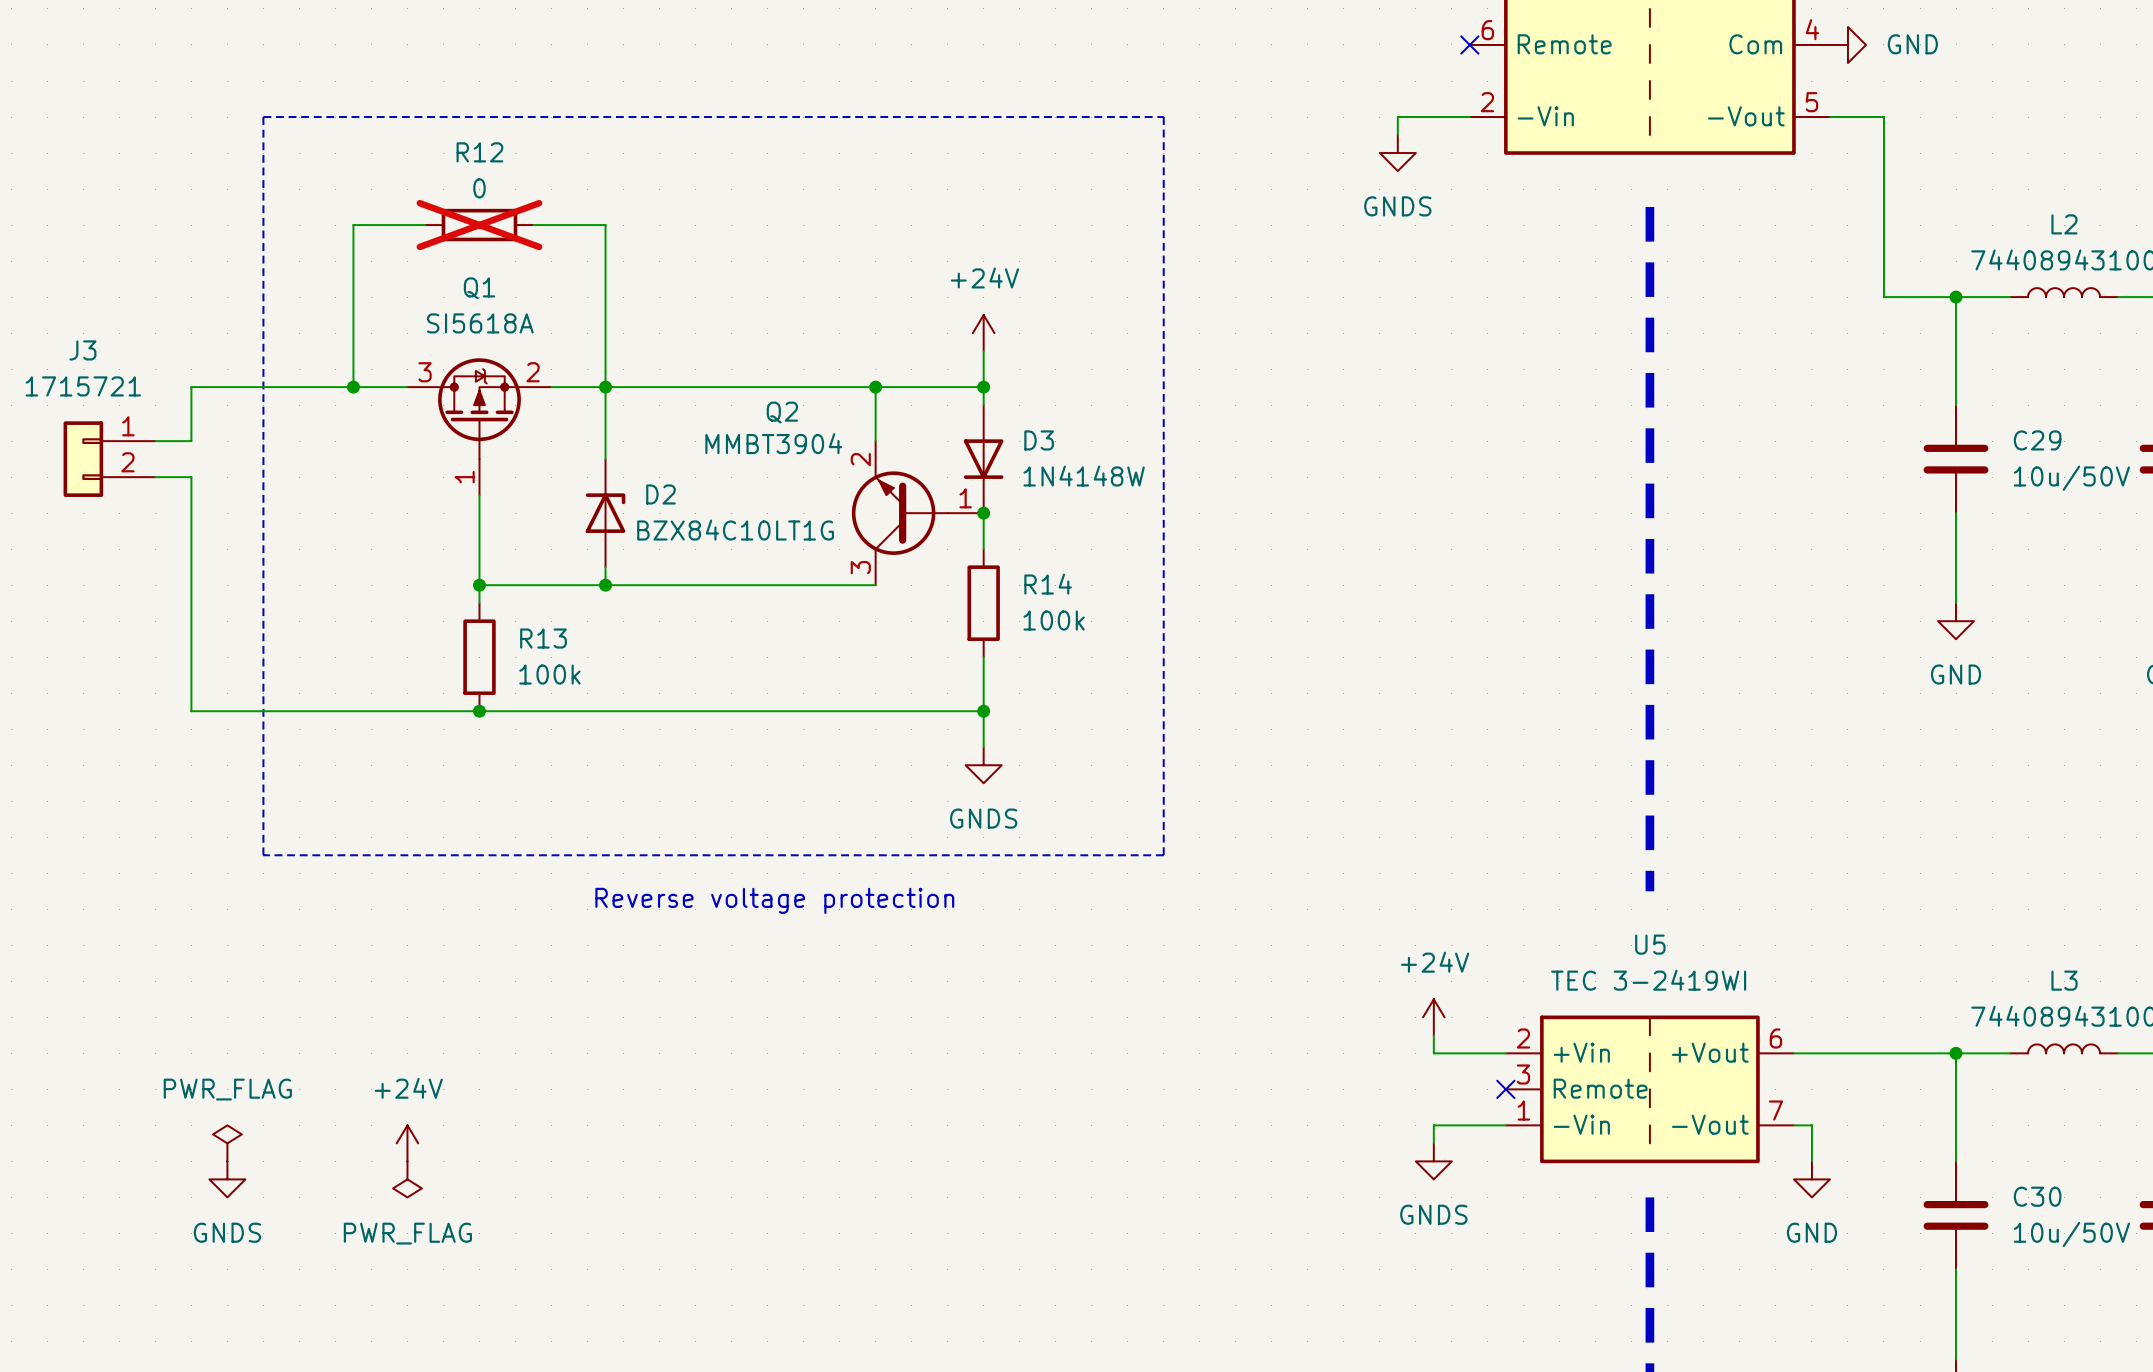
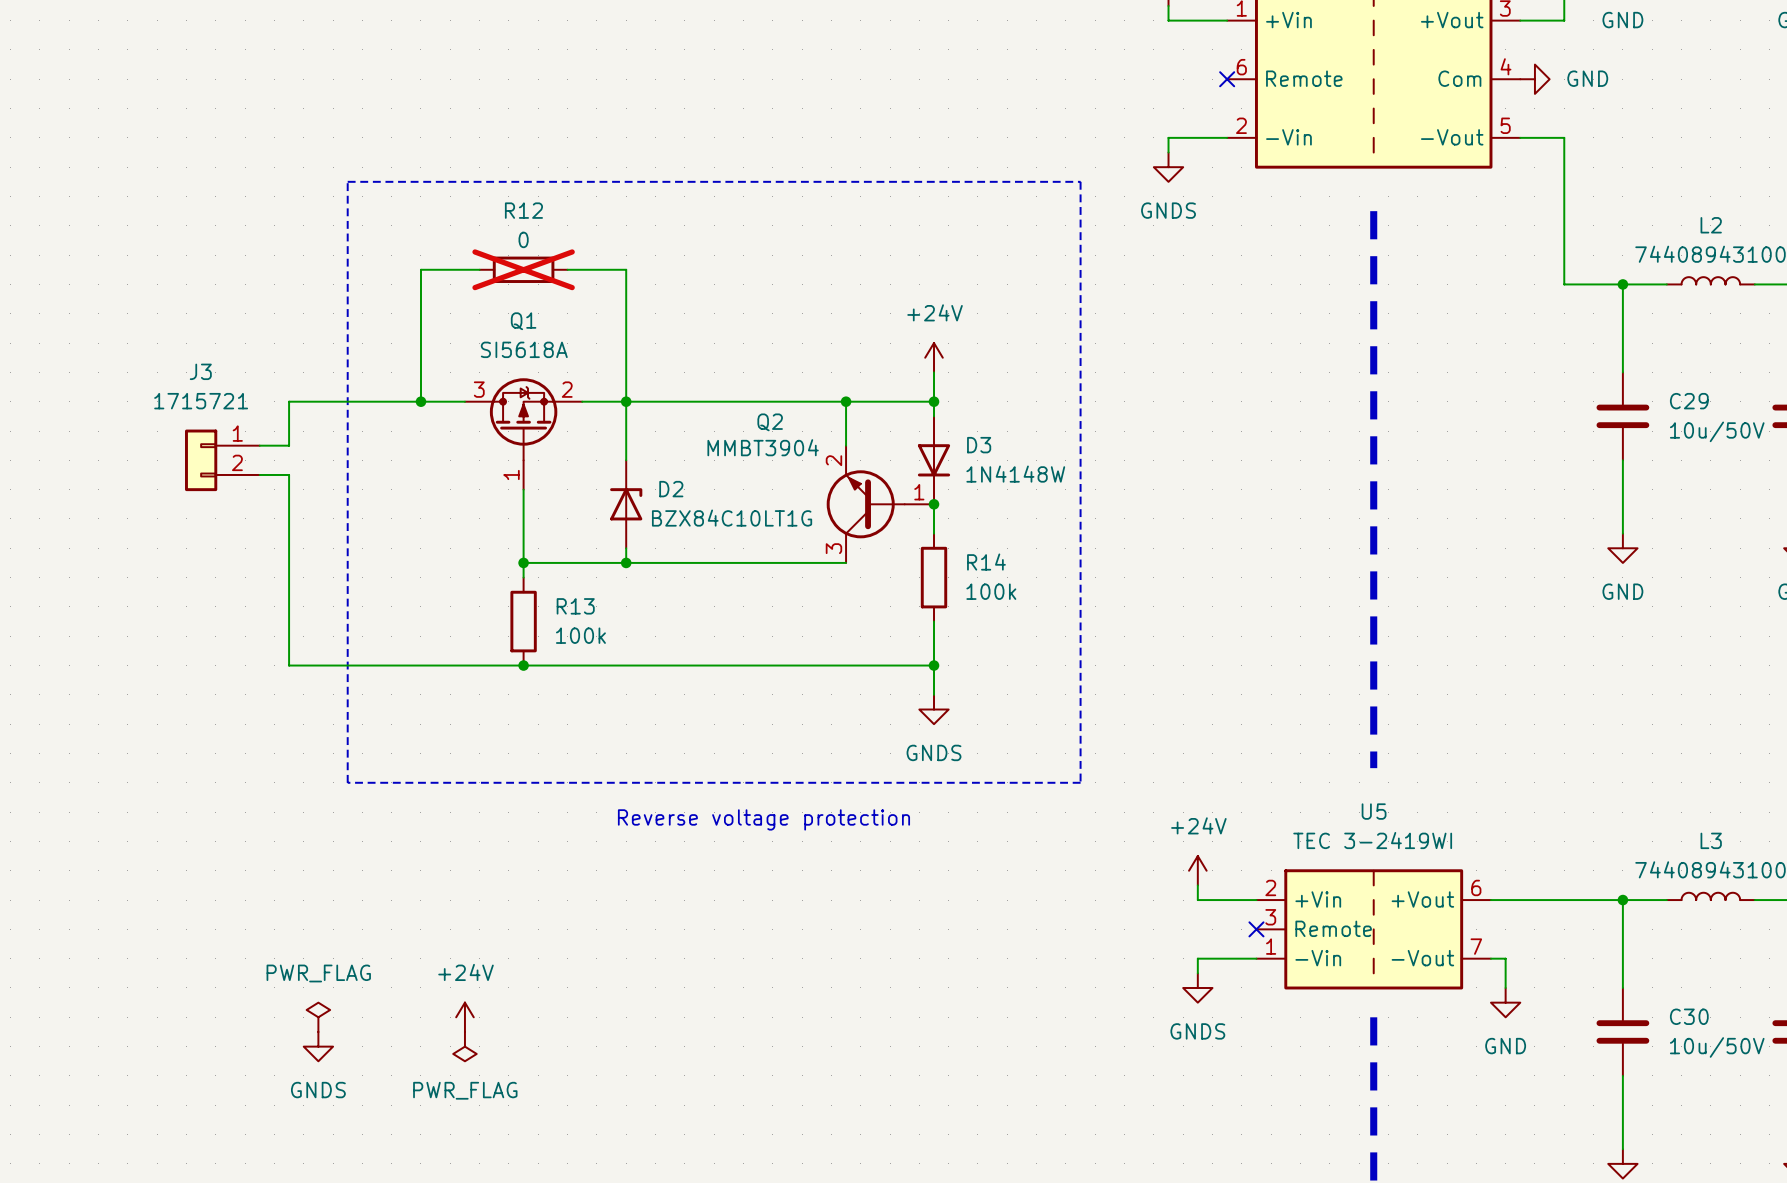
line: (263, 117) (1163, 117) (1163, 855) (263, 855) (263, 117) -> (347, 181) (1080, 181) (1080, 782) (347, 782) (347, 181)
wire: (425, 225) (353, 225) (353, 387) -> (479, 269) (420, 269) (420, 401)
R12 position: (479, 225) -> (523, 269)
wire: (533, 225) (605, 225) (605, 459) -> (567, 269) (626, 269) (626, 460)
power symbol position: +24V (983, 333) -> +24V (934, 357)
wire: (983, 351) (983, 405) -> (934, 372) (934, 416)
junction: (353, 387) -> none
wire: (407, 387) (191, 387) (191, 441) (155, 441) -> (464, 401) (289, 401) (289, 445) (259, 445)
wire: (551, 387) (983, 387) -> (582, 401) (934, 401)
junction: (605, 387) -> none
wire: (875, 387) (875, 441) -> (846, 401) (846, 445)
junction: (875, 387) -> none
junction: (983, 387) -> none
Q1 position: (479, 426) -> (523, 433)
junction: none -> (420, 401)
junction: none -> (626, 401)
junction: none -> (846, 401)
junction: none -> (934, 401)
J3 position: (109, 459) -> (222, 460)
D3 position: (983, 459) -> (934, 460)
wire: (155, 477) (191, 477) (191, 711) (983, 711) -> (259, 474) (289, 474) (289, 665) (934, 665)
wire: (479, 495) (479, 603) -> none
D2 position: (605, 513) -> (626, 504)
Q2 position: (917, 513) -> (880, 504)
wire: (983, 513) (983, 549) -> (934, 504) (934, 533)
junction: (983, 513) -> none
junction: none -> (934, 504)
wire: (479, 585) (875, 585) -> (523, 562) (846, 562)
junction: (479, 585) -> none
wire: none -> (523, 518) (523, 577)
junction position: (605, 585) -> (523, 562)
R14 position: (983, 603) -> (934, 577)
wire: none -> (626, 548) (626, 562)
junction: none -> (626, 562)
R13 position: (479, 657) -> (523, 621)
wire: (983, 657) (983, 747) -> (934, 621) (934, 694)
junction: (479, 711) -> none
junction: (983, 711) -> none
junction: none -> (523, 665)
power symbol position: GNDS (983, 765) -> GNDS (934, 709)
junction: none -> (934, 665)
text position: Reverse voltage protection (774, 900) -> Reverse voltage protection (763, 819)
power symbol: PWR_FLAG (227, 1143) -> none
power symbol position: +24V (407, 1143) -> +24V (464, 1017)
power symbol position: GNDS (227, 1179) -> GNDS (318, 1046)
power symbol rotation: 0° (407, 1179) -> 180° (318, 1017)
power symbol position: PWR_FLAG (407, 1179) -> PWR_FLAG (318, 1017)
power symbol: none -> PWR_FLAG (464, 1046)

